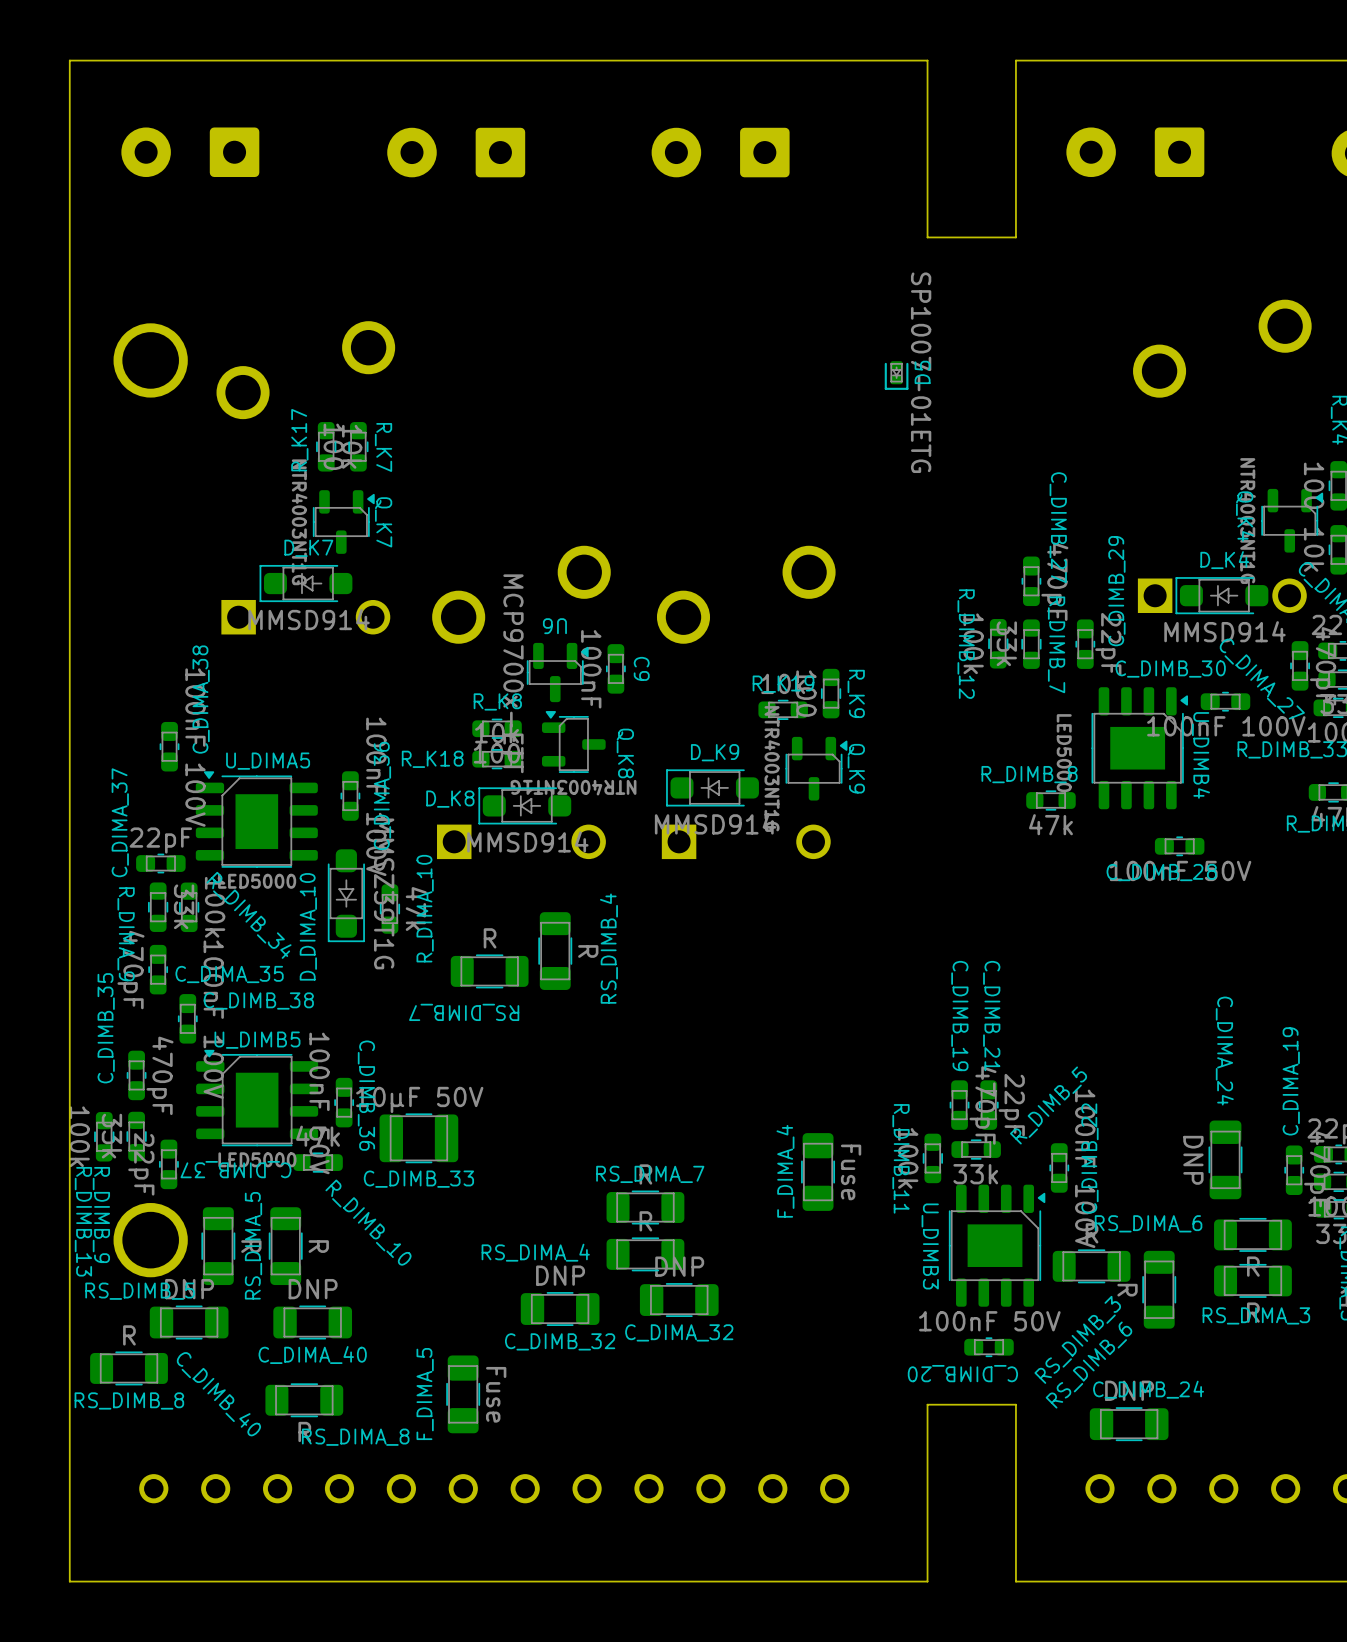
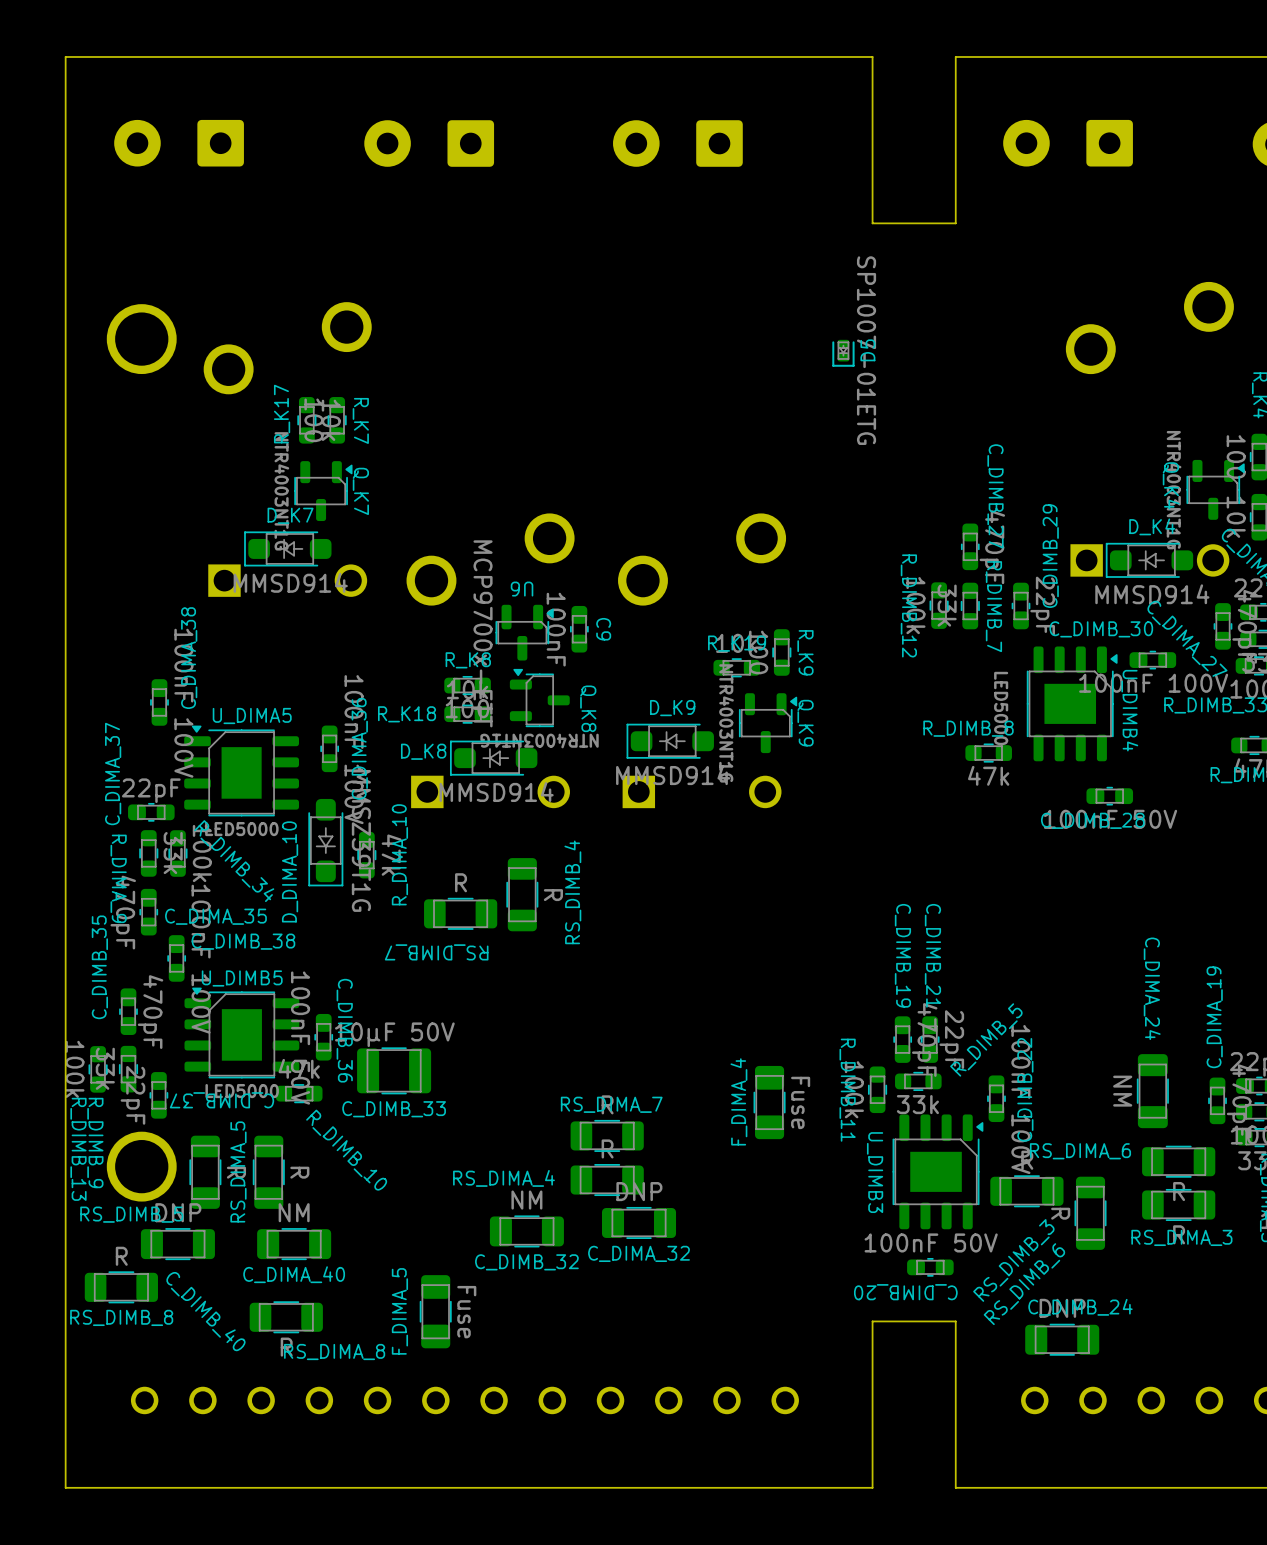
C_DIMA_24 value: DNP (1193, 1160) -> NM (1122, 1091)
C_DIMB_32 value: DNP (560, 1275) -> NM (526, 1200)
C_DIMA_40 value: DNP (313, 1289) -> NM (294, 1212)

